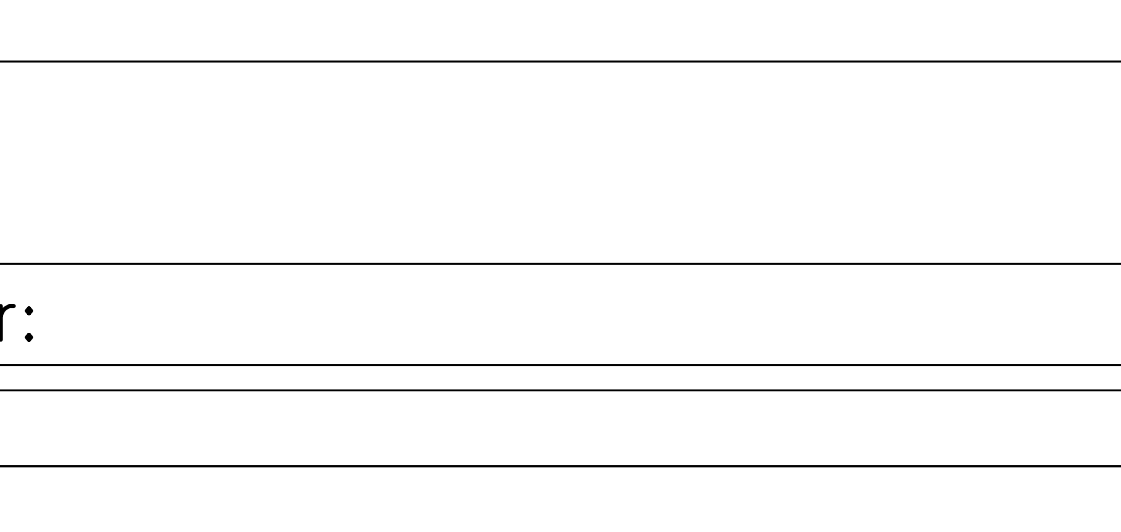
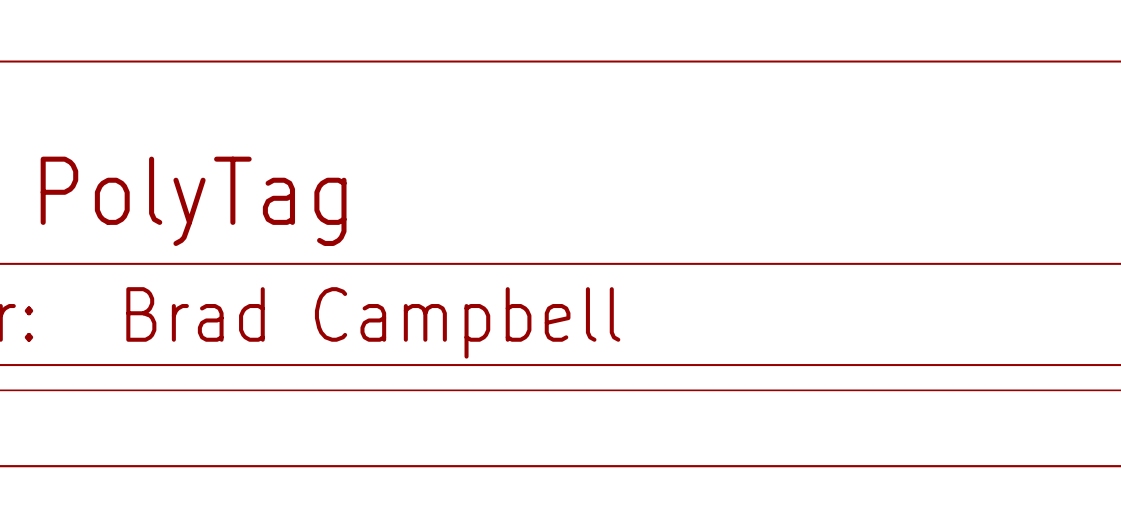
part text: none -> PolyTag (193, 201)
part text: none -> Brad Campbell (373, 322)

